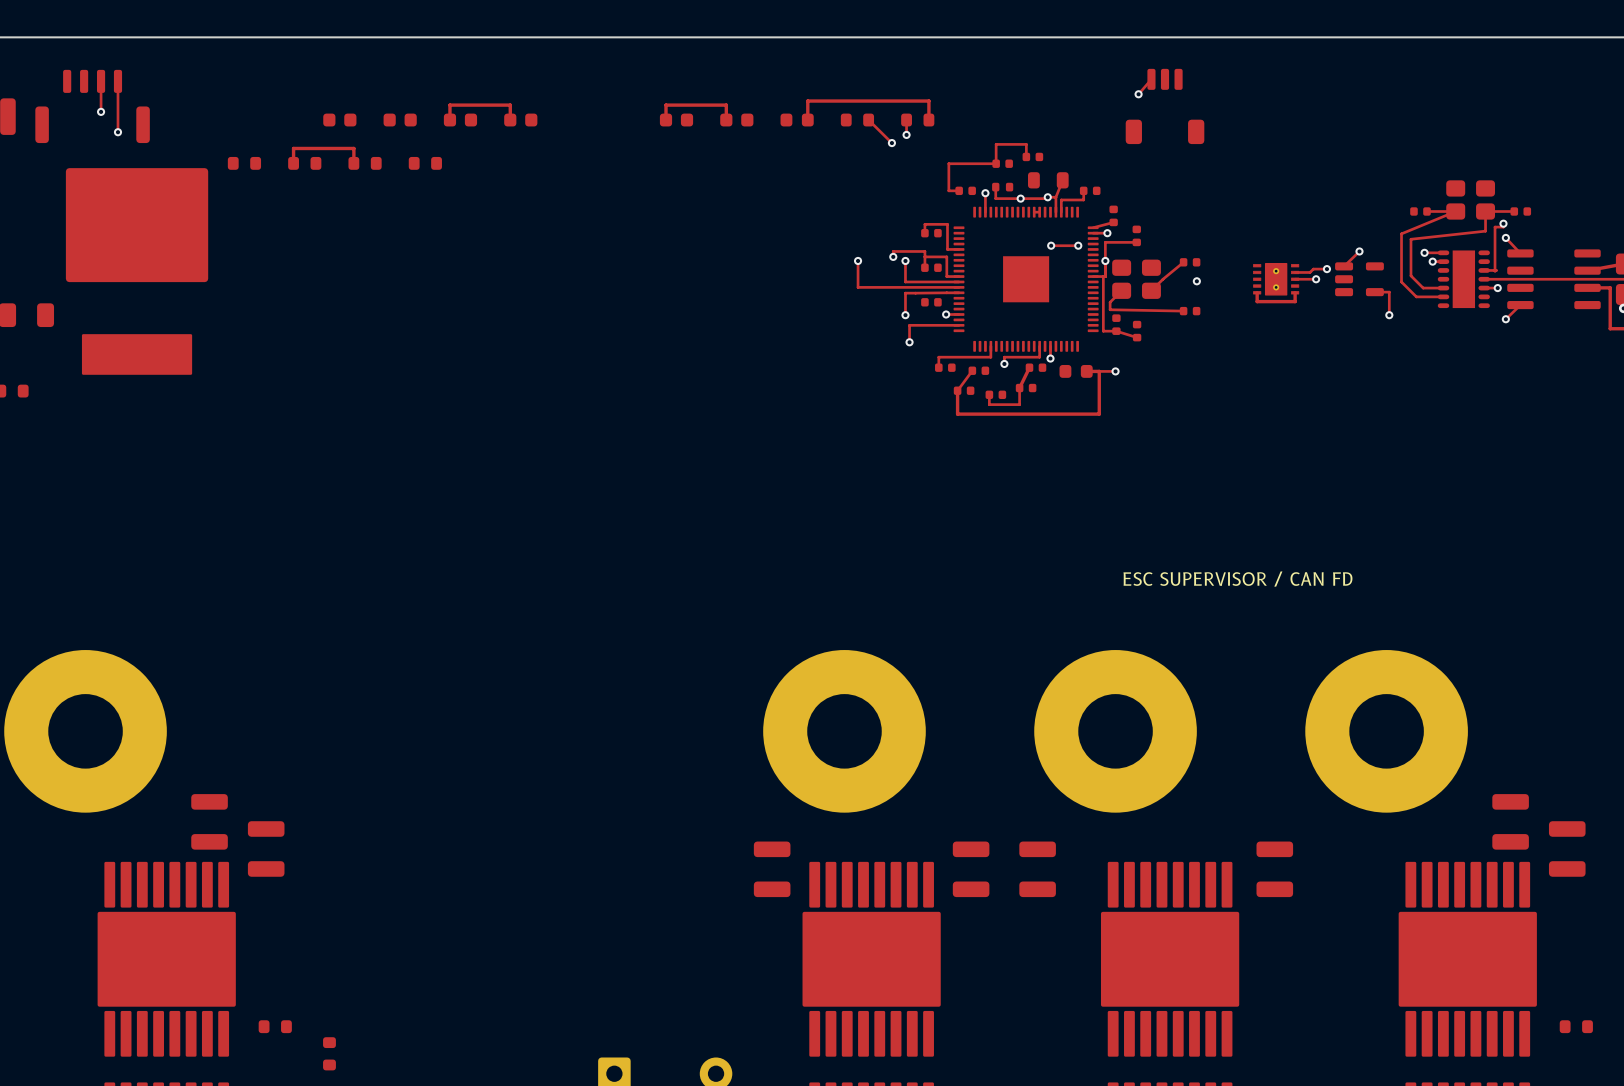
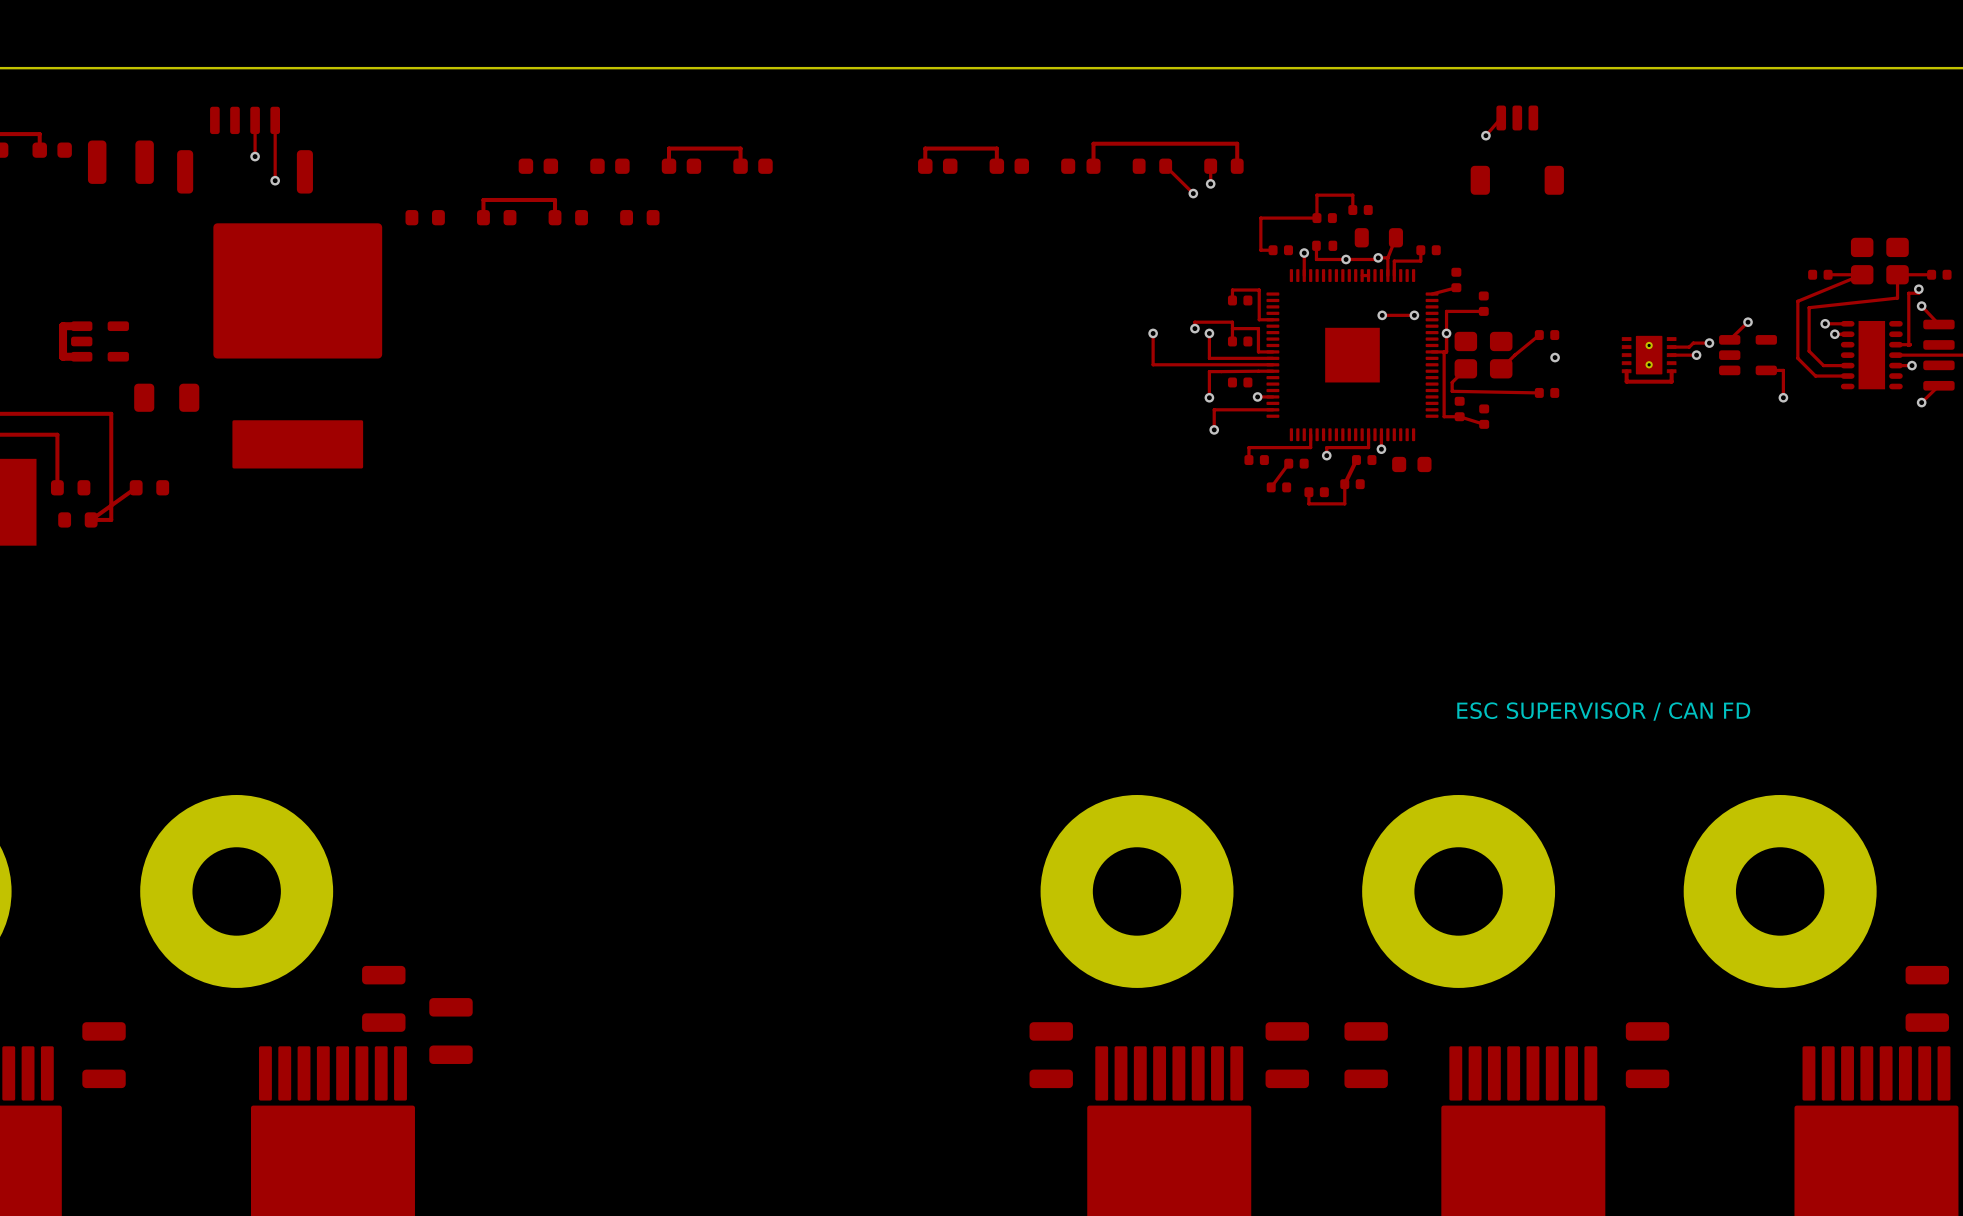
track: (1093, 233) (1107, 233) -> none
via: (1107, 233) -> none
track: (1115, 371) (1086, 371) (1099, 371) (1099, 414) (957, 414) (957, 390) -> none
via: (1115, 371) -> none

